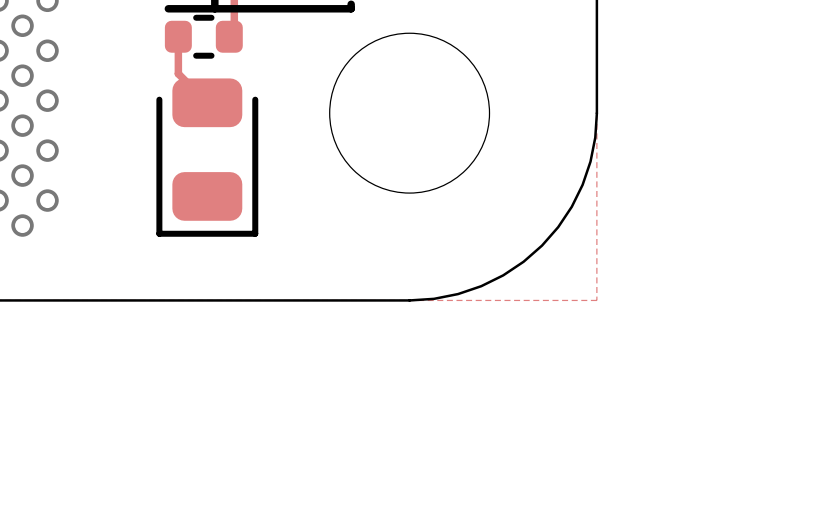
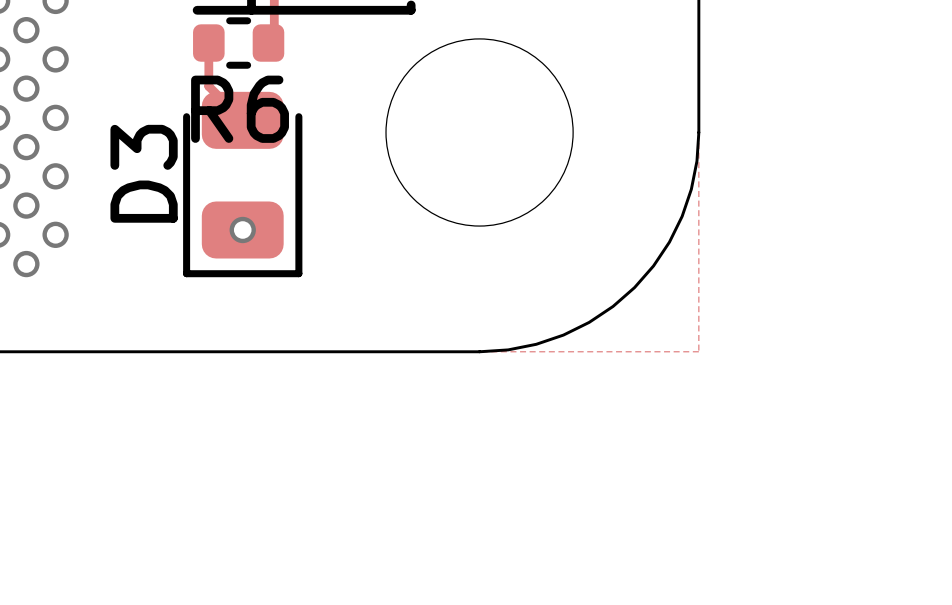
R6 name: none -> R6 (240, 109)
D3 name: none -> D3 (144, 173)
via: none -> (242, 229)

